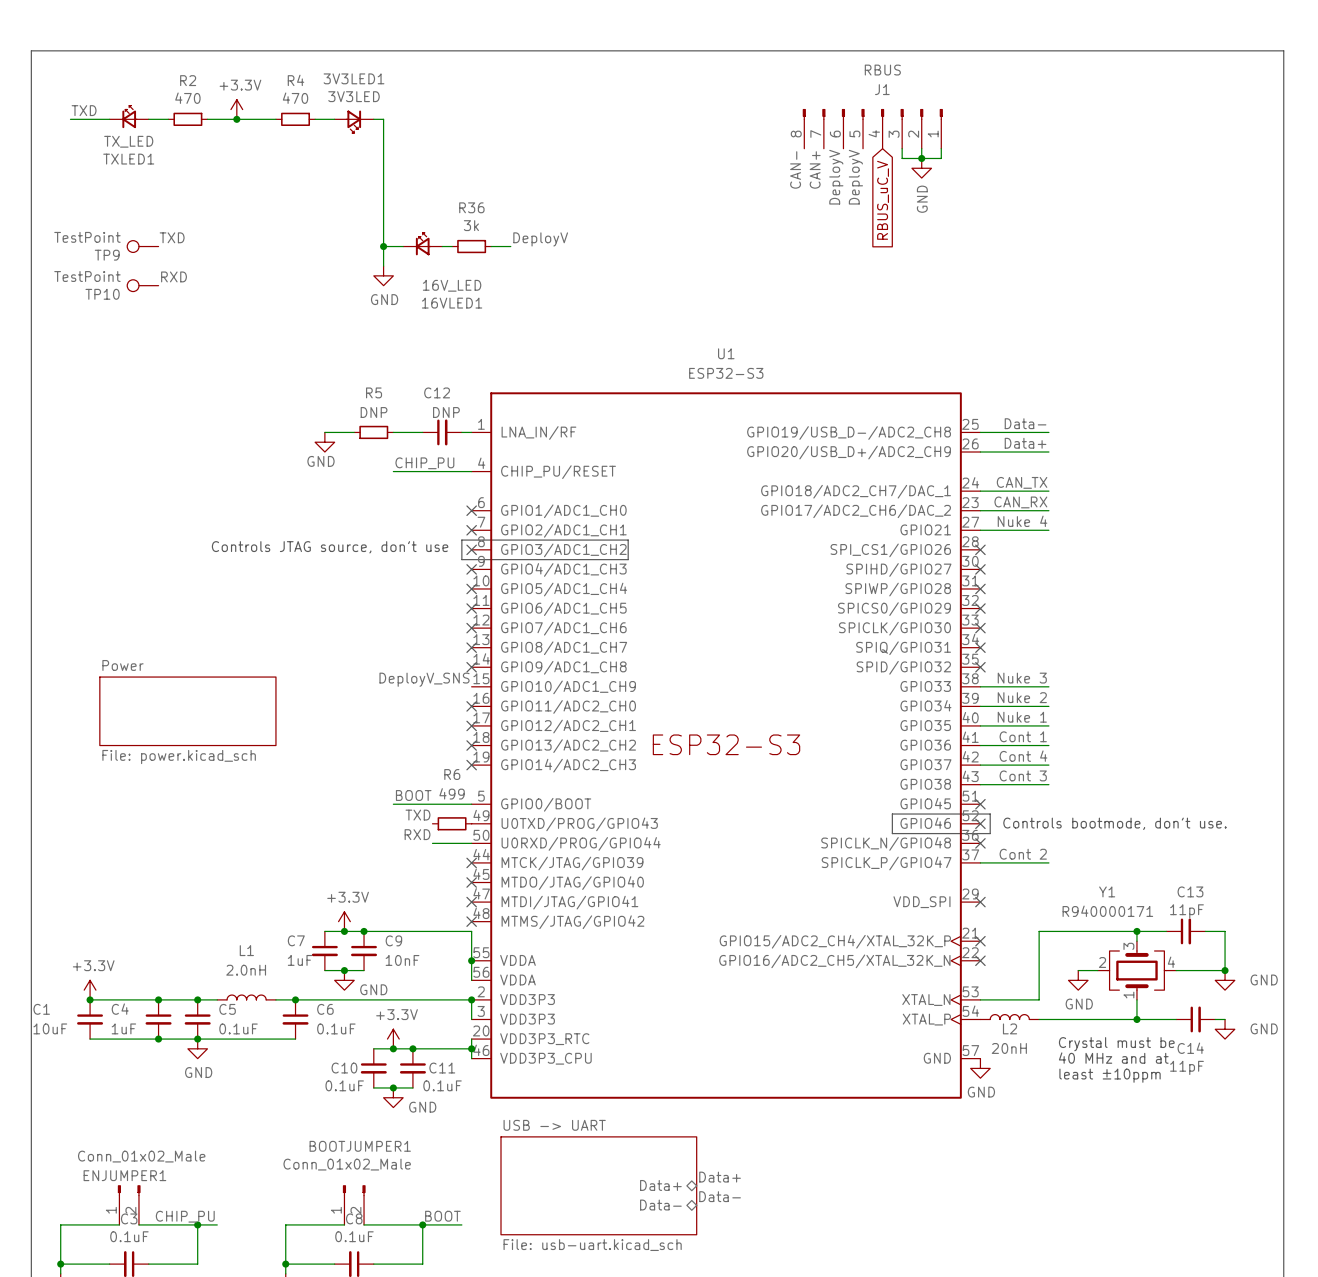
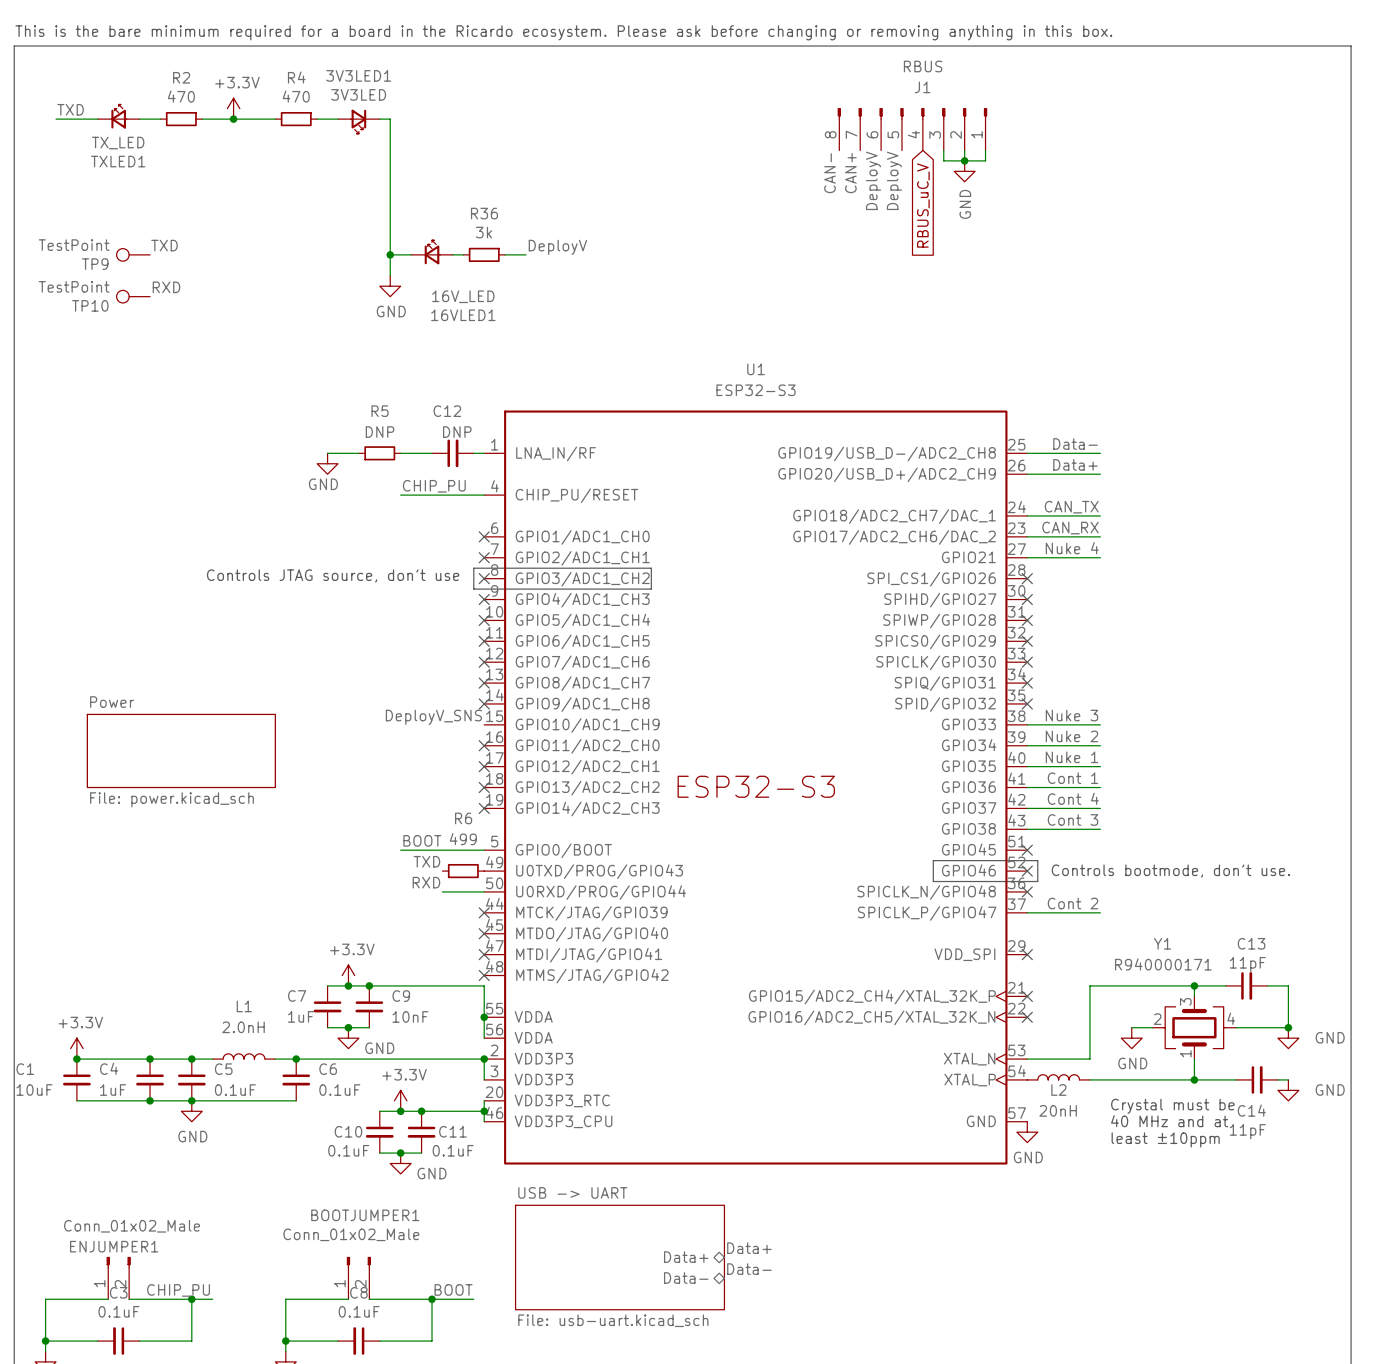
text: none -> This is the bare minimum required for a board in the Ricardo ecosystem. Please ask before changing or removing anything in this box. (563, 32)

